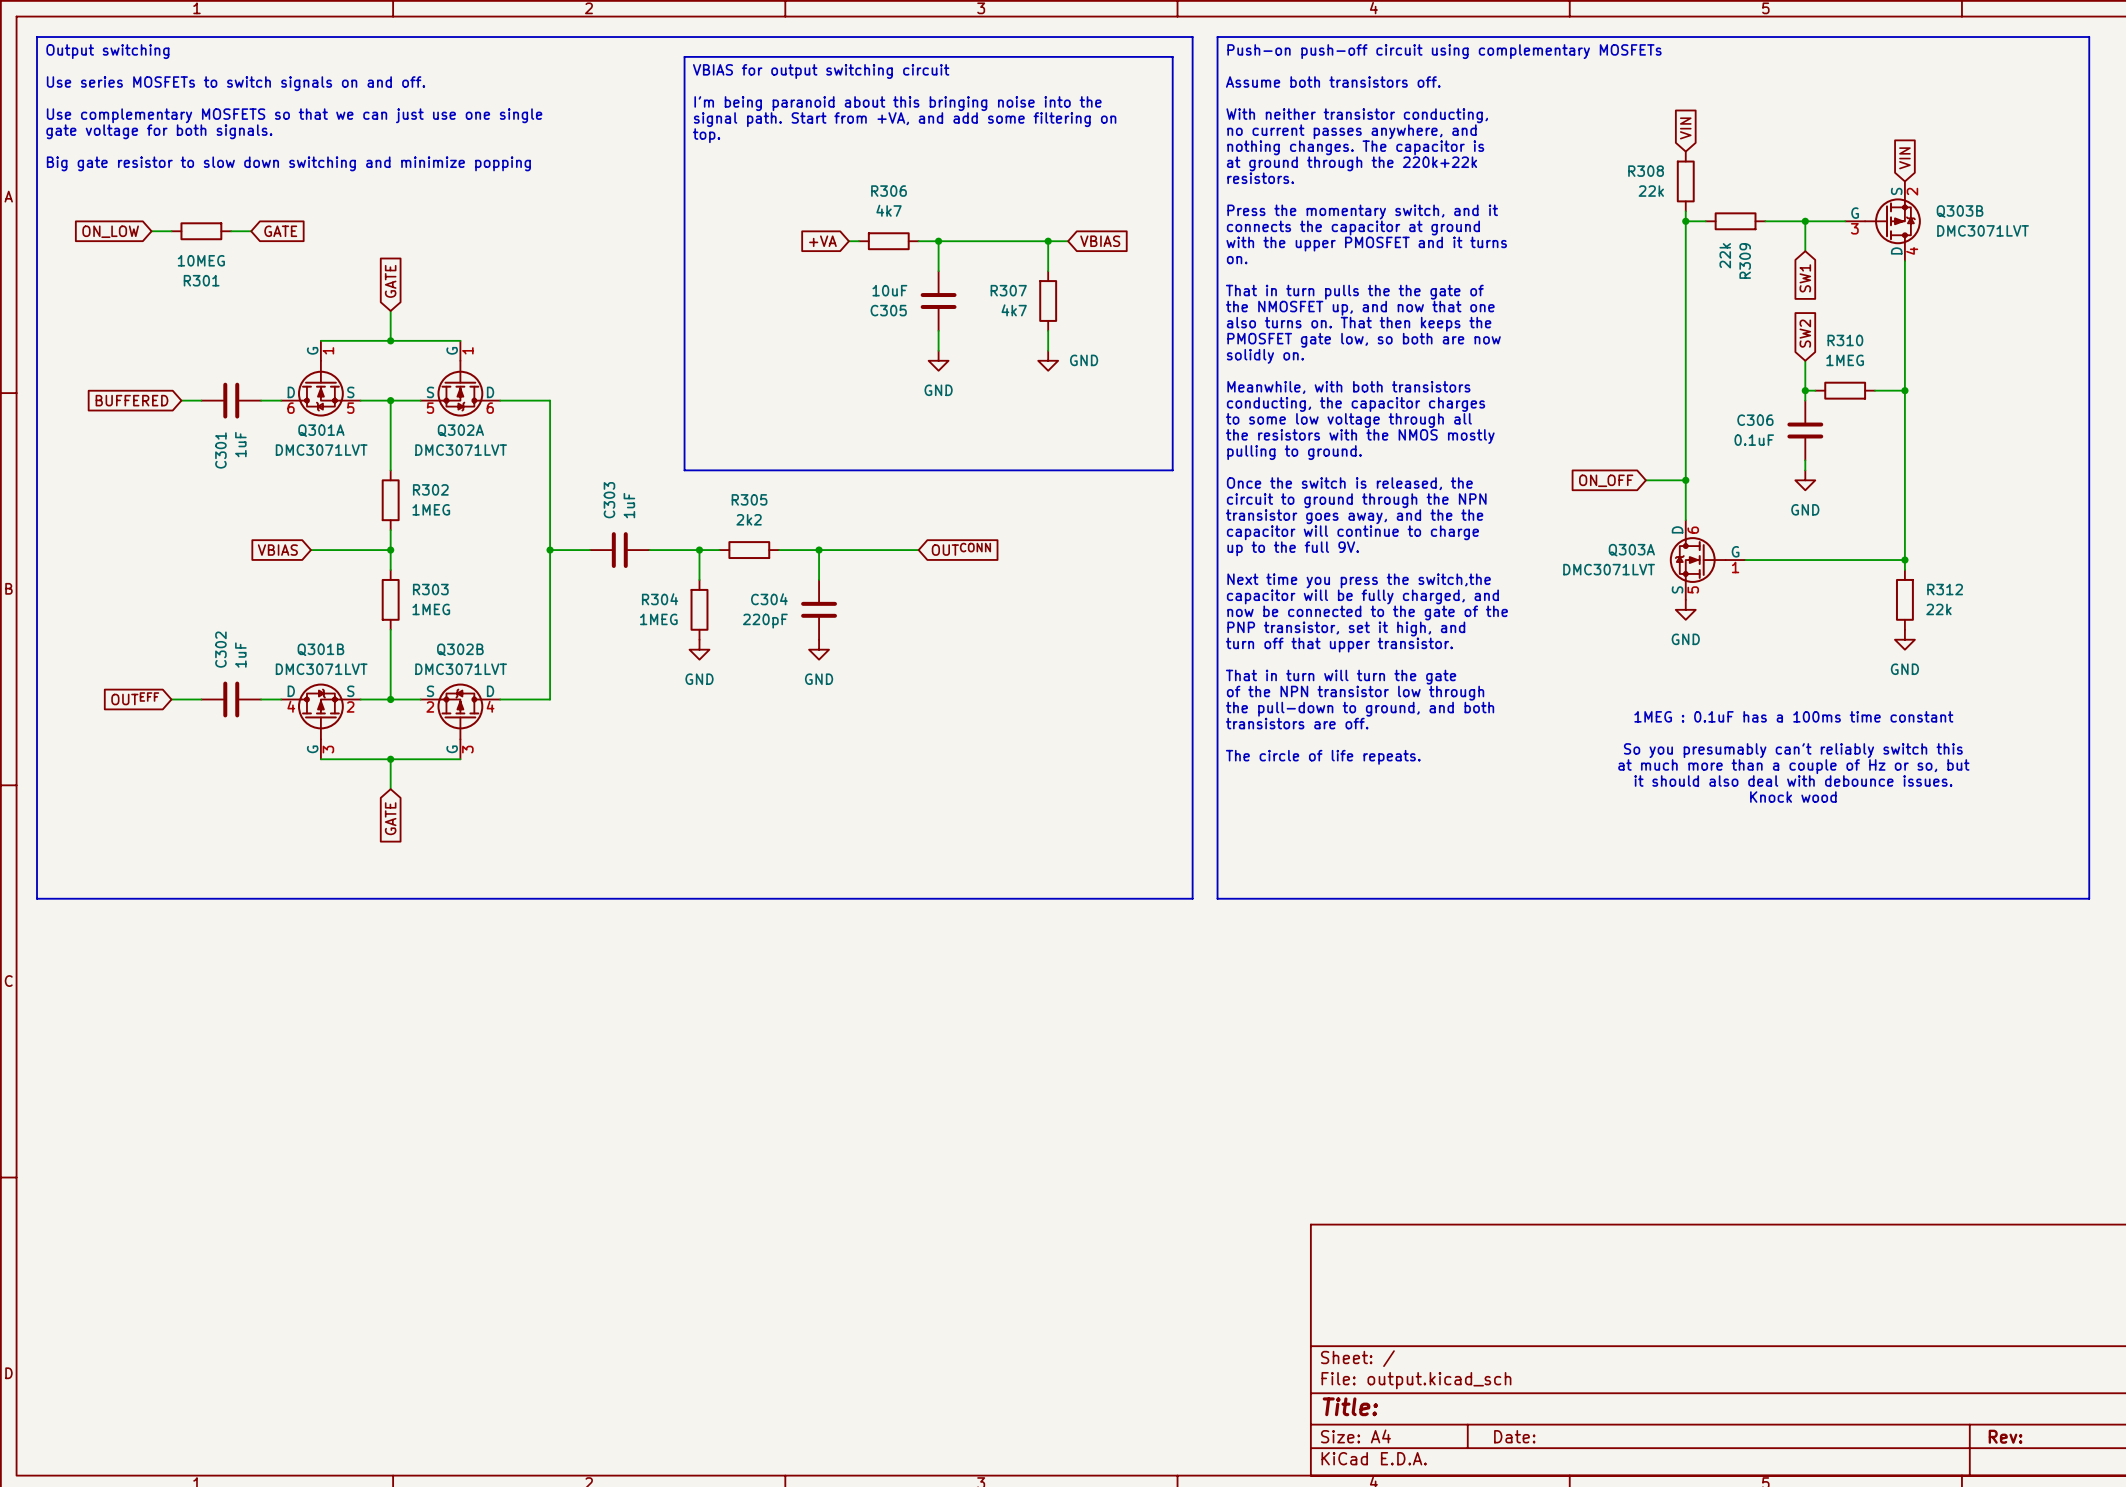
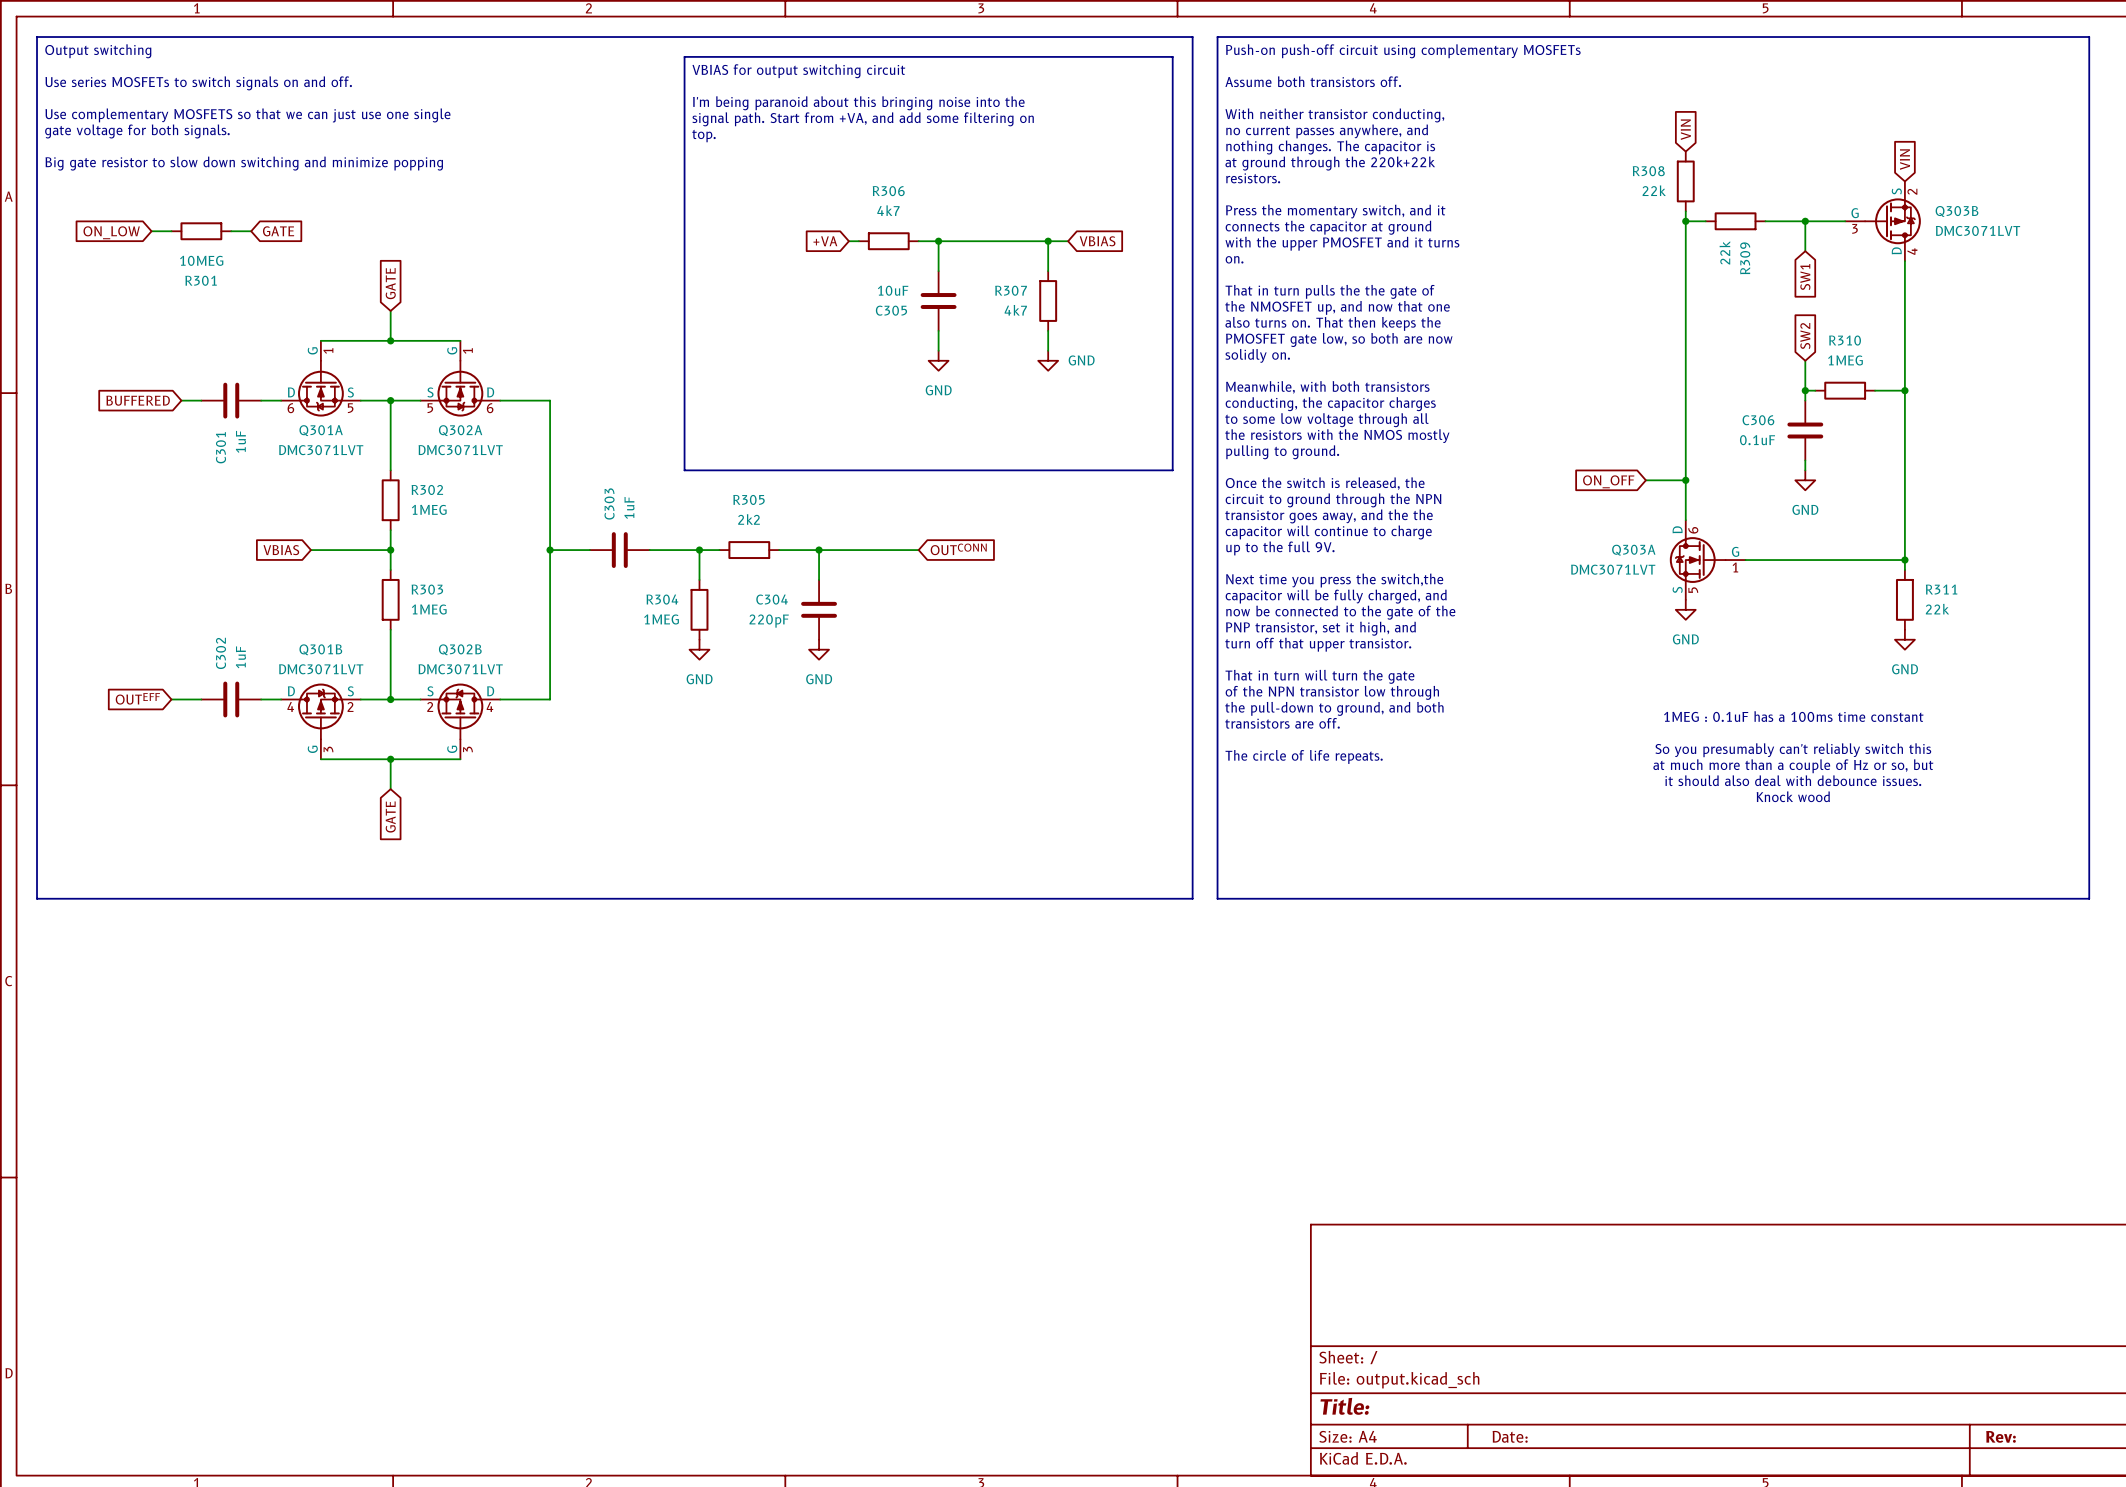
R312 name: R312 (1945, 589) -> R311 (1941, 589)

